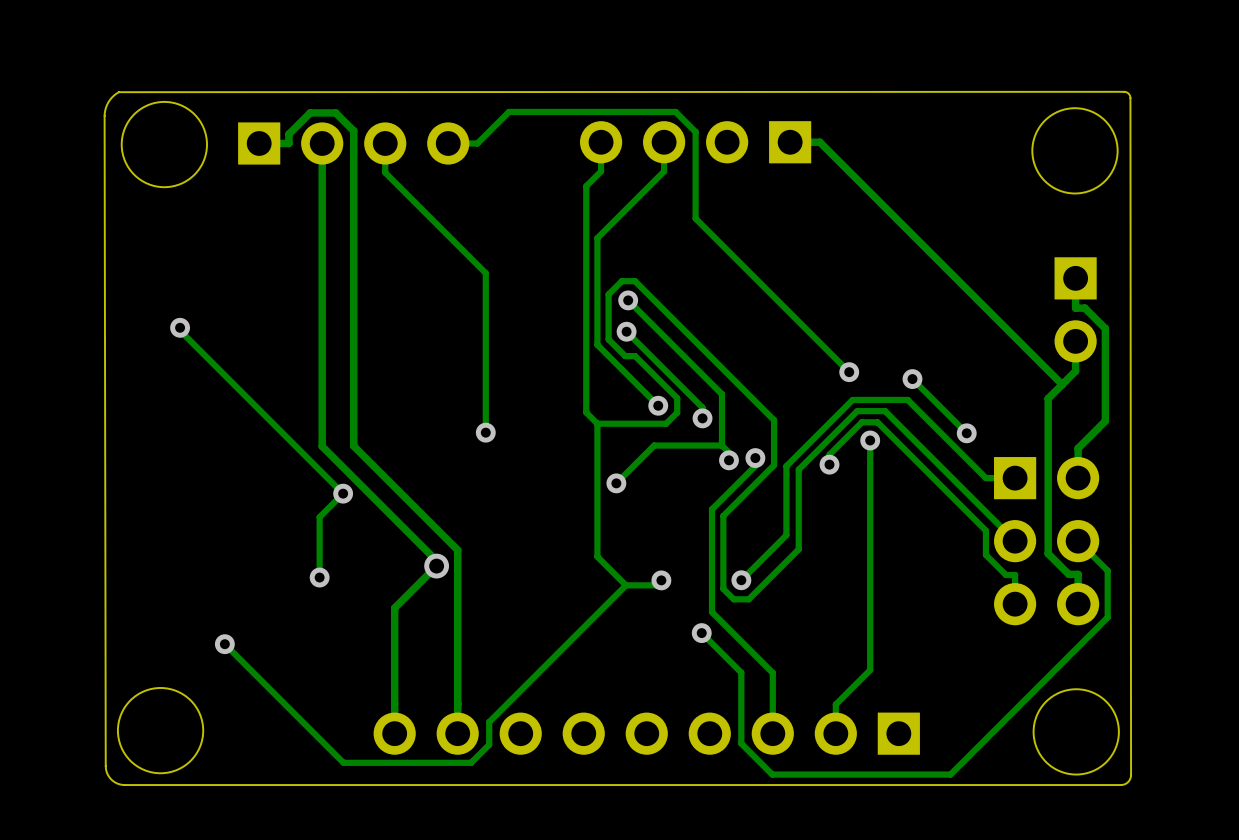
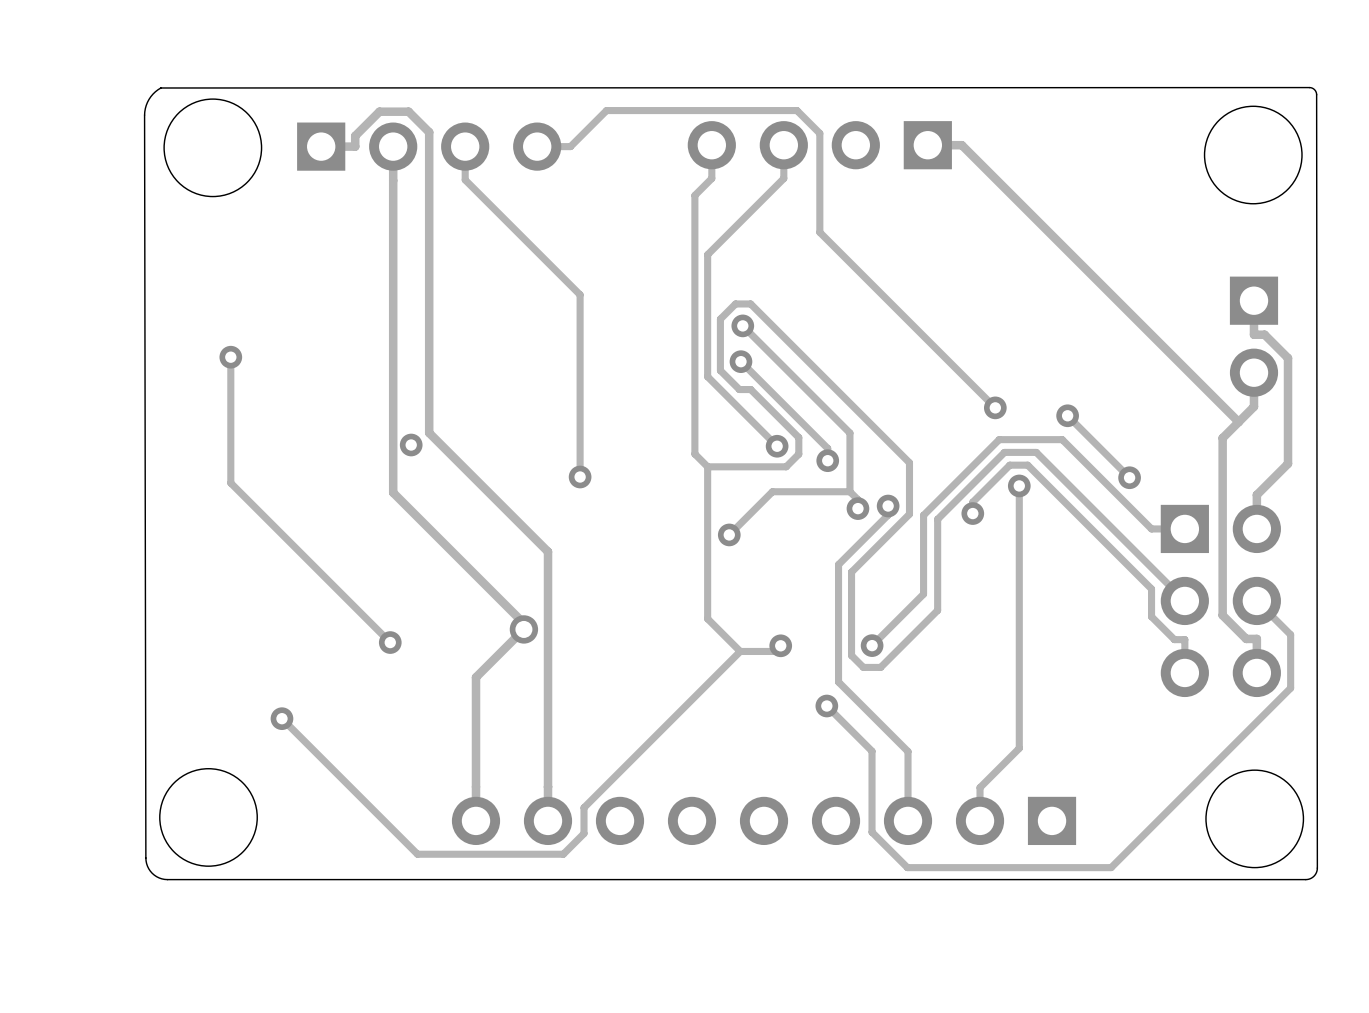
track: (180, 330) (343, 493) (319, 517) (319, 577) -> (230, 360) (230, 483) (390, 642)
track: (353, 394) (353, 446) (457, 550) -> (429, 432) (548, 551) (548, 611)
via position: (343, 493) -> (411, 445)

